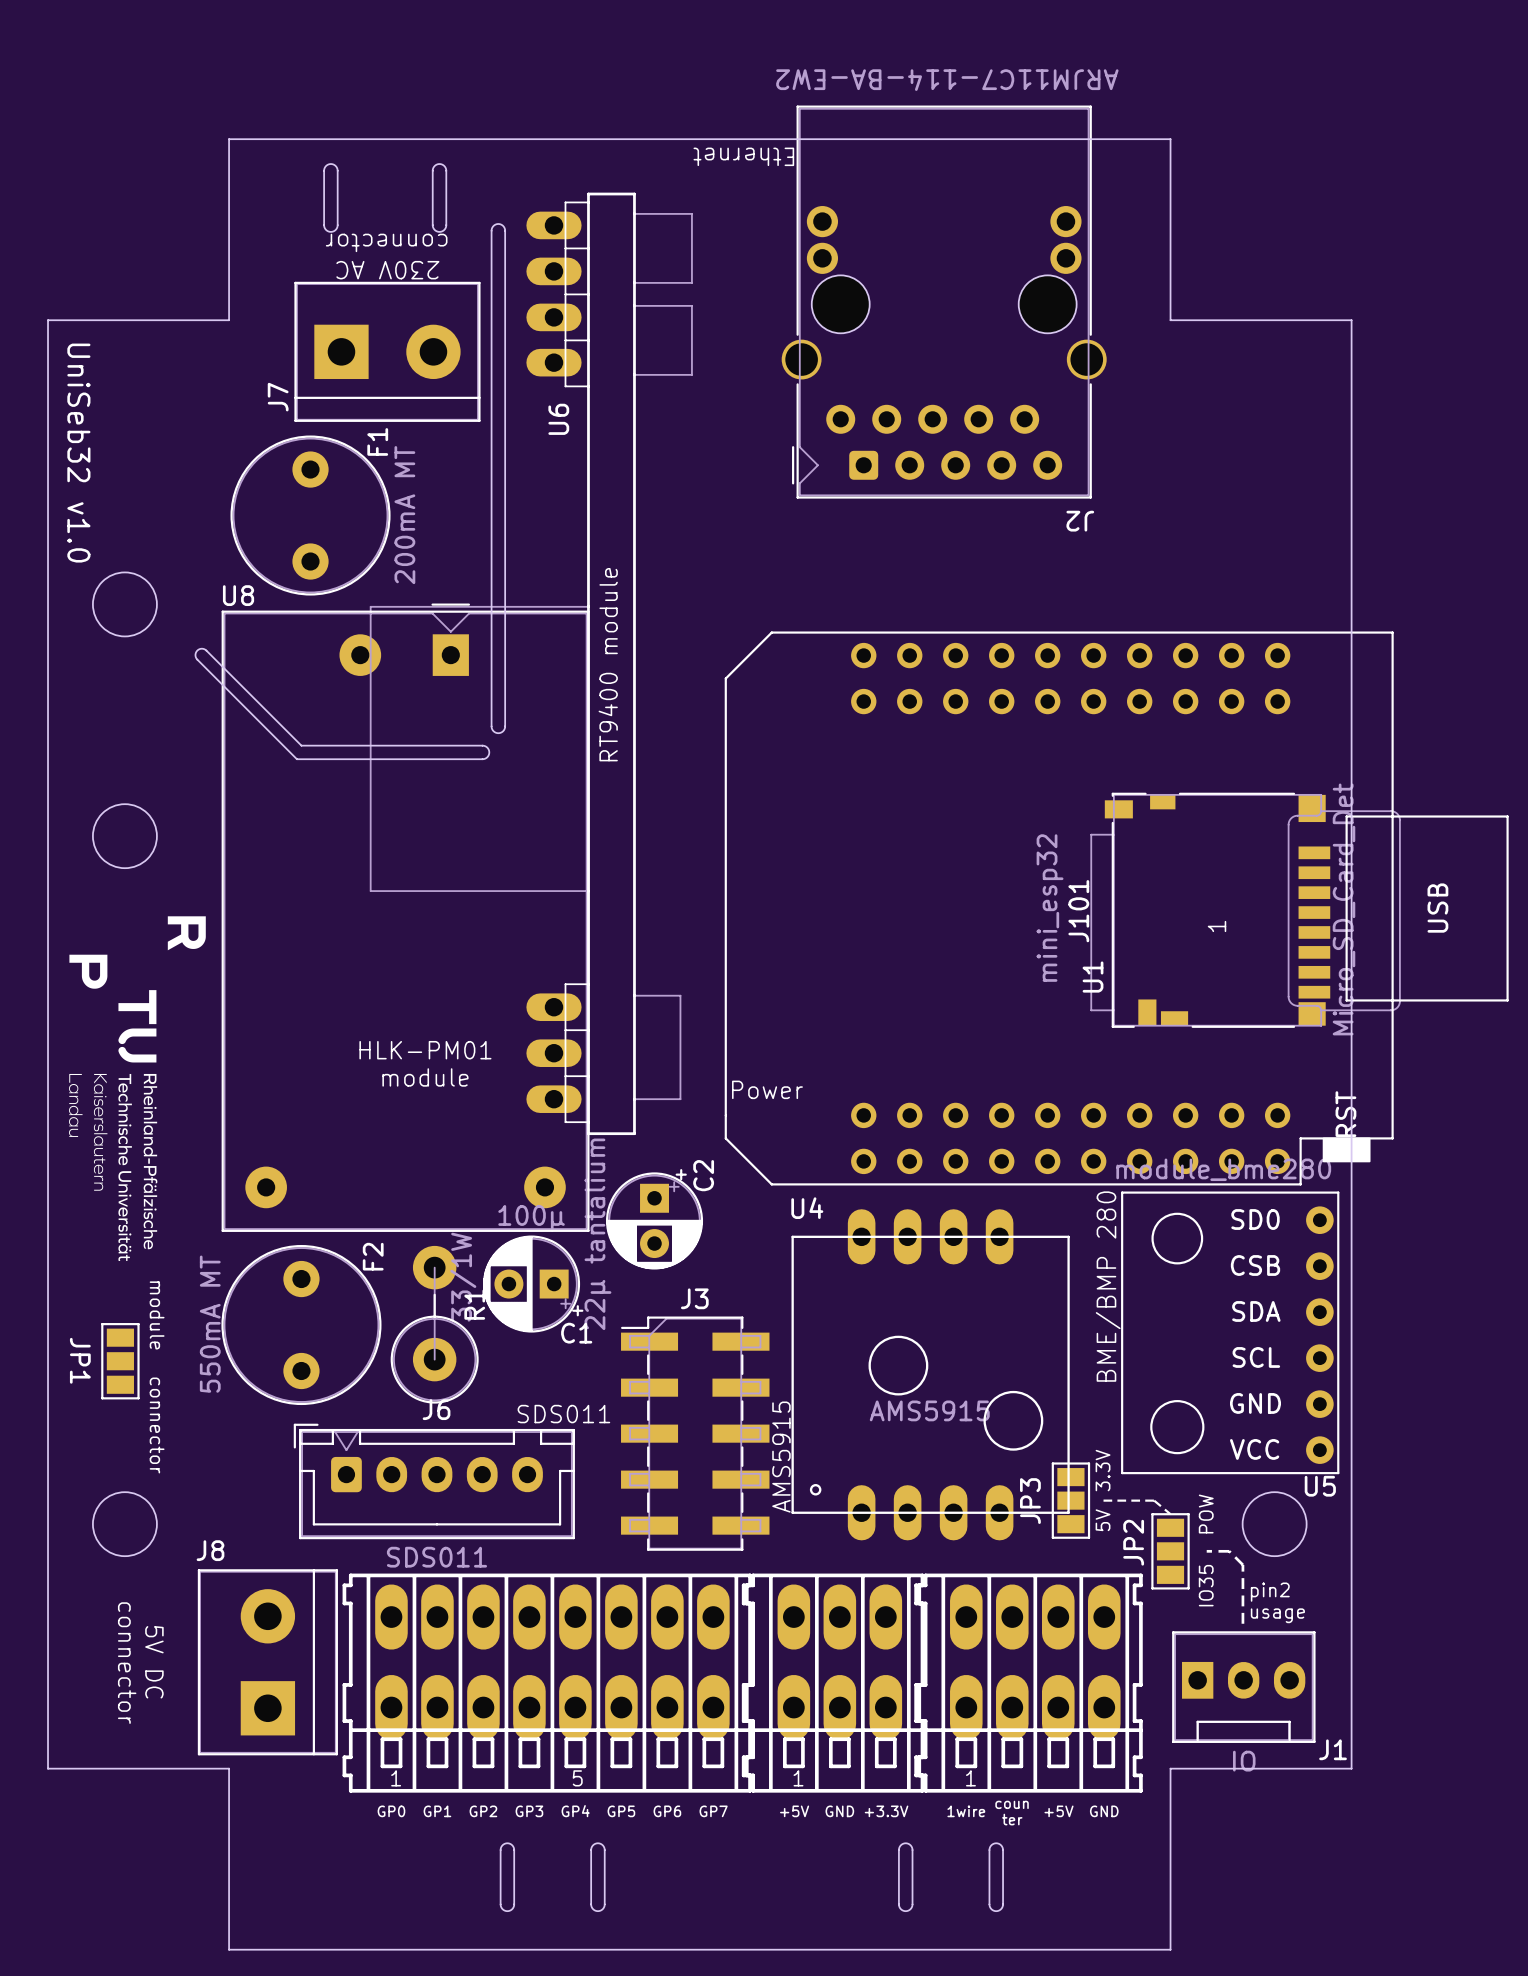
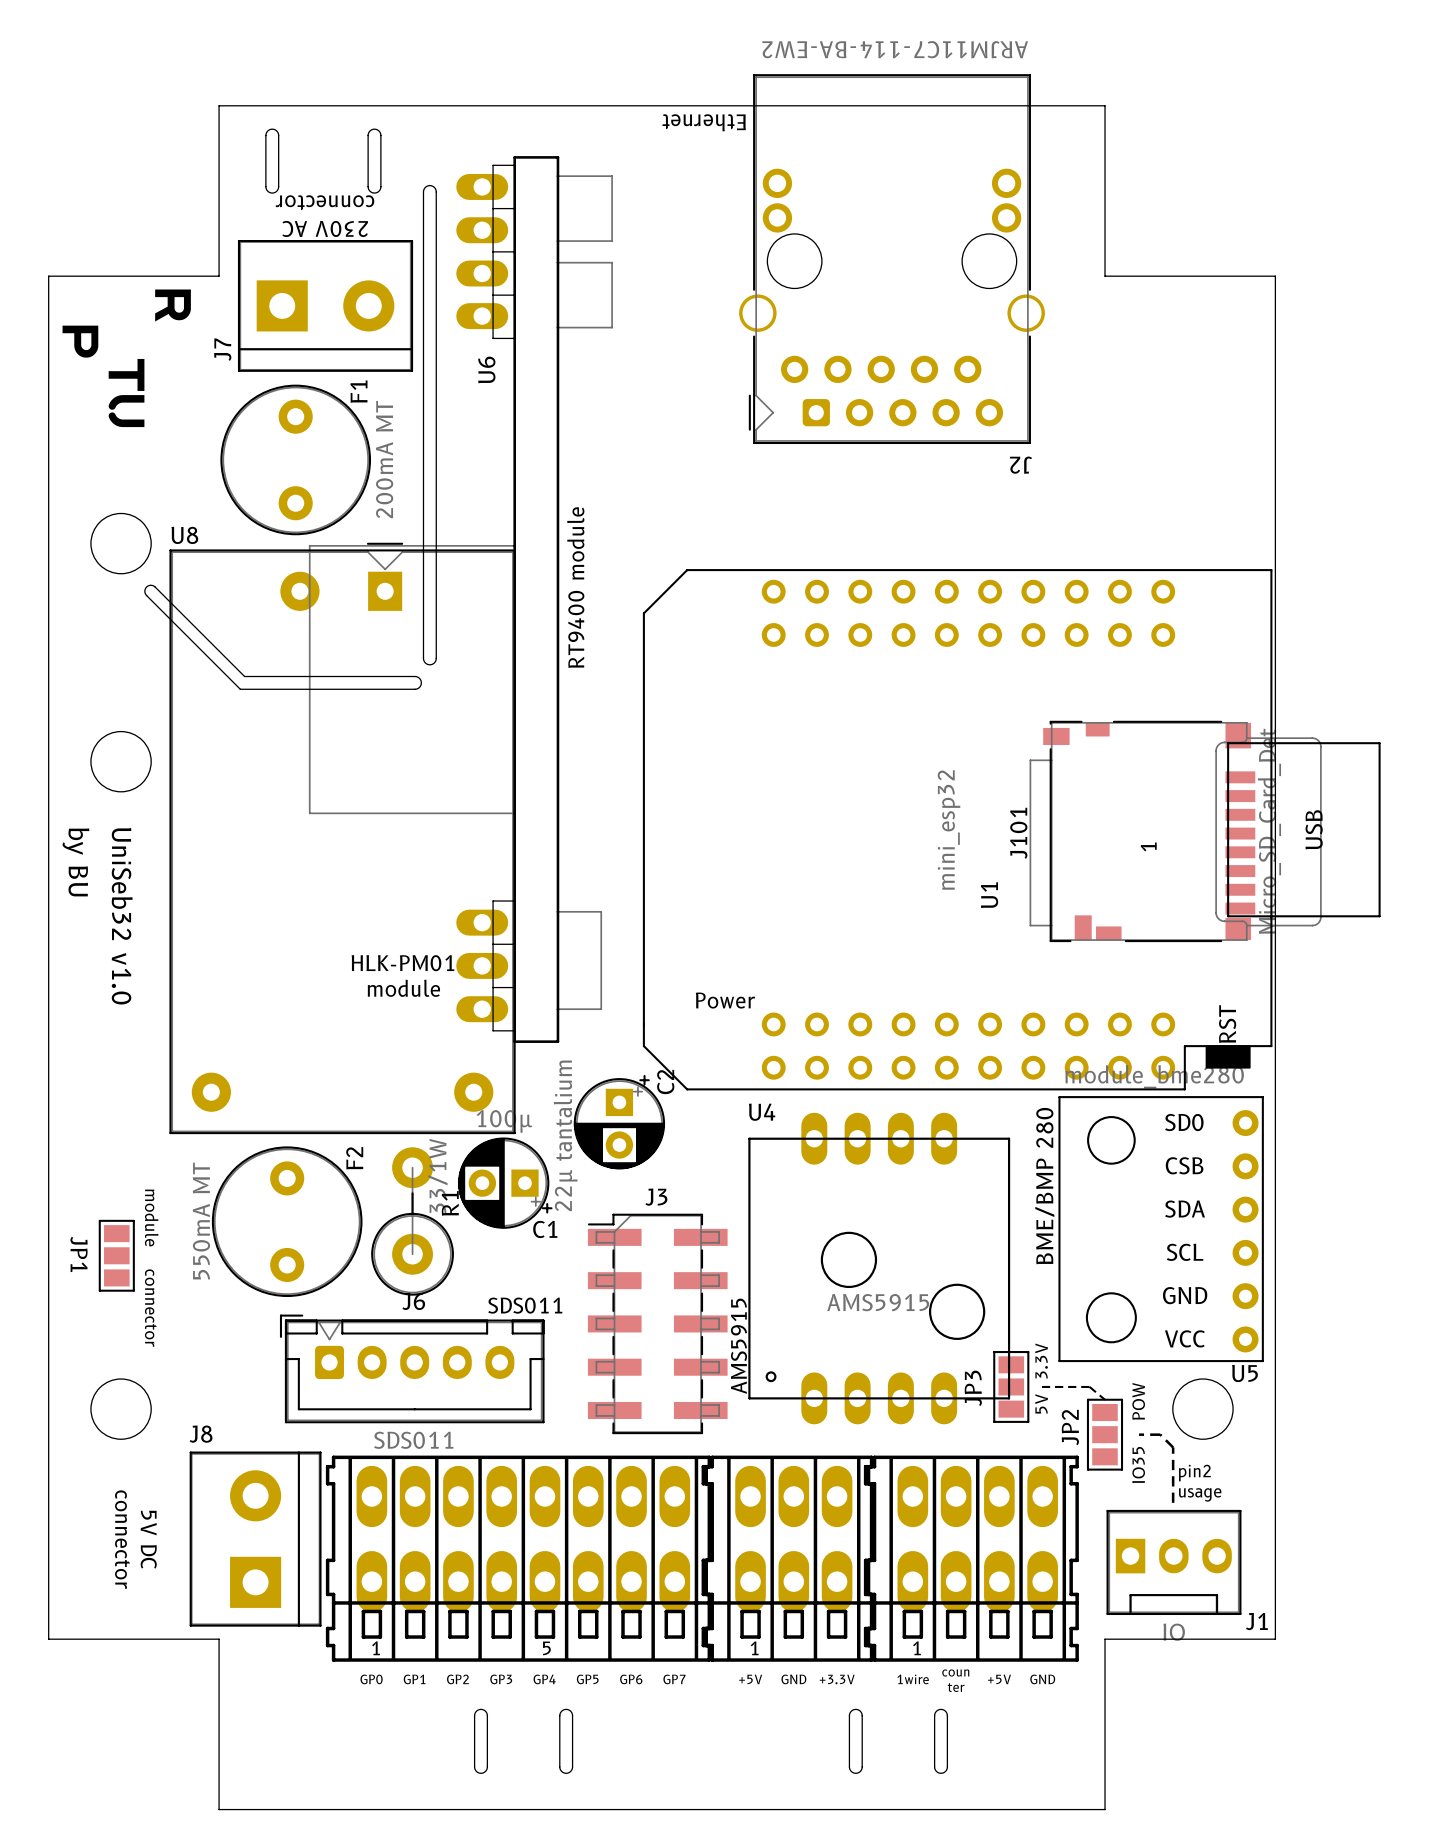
board edge: (324, 170) (324, 226) (326, 230) (331, 231) (337, 226) (337, 169) (335, 165) (329, 164) (326, 166) (324, 170) -> (265, 135) (265, 187) (268, 191) (273, 193) (278, 187) (278, 134) (276, 130) (271, 129) (267, 131) (265, 135)
board edge: (432, 170) (432, 226) (435, 230) (440, 231) (446, 226) (446, 169) (443, 165) (438, 164) (434, 166) (432, 170) -> (368, 135) (368, 187) (370, 191) (375, 193) (380, 187) (380, 134) (378, 130) (373, 129) (369, 131) (368, 135)
board edge: (491, 230) (491, 726) (493, 731) (498, 733) (503, 731) (505, 726) (505, 230) (503, 225) (498, 223) (493, 225) (491, 230) -> (423, 191) (423, 658) (425, 662) (429, 664) (434, 662) (436, 658) (436, 191) (434, 187) (429, 185) (425, 187) (423, 191)
text position: connector (386, 242) -> connector (324, 202)
text position: 230V AC (387, 270) -> 230V AC (325, 228)
drawing: none -> [155, 289, 191, 322]
J7 position: (387, 351) -> (325, 305)
drawing: none -> [62, 325, 145, 428]
text: UniSeb32 v1.0 (78, 453) -> none
U6 position: (531, 663) -> (460, 599)
board edge: (301, 745) (206, 650) (201, 648) (197, 650) (195, 655) (197, 659) (296, 759) -> (287, 676) (244, 676) (155, 587) (150, 585) (145, 588) (146, 595) (240, 689) (282, 689)
board edge: (437, 745) (483, 745) (487, 748) (489, 752) (487, 756) (483, 759) (437, 759) -> (414, 676) (419, 678) (421, 682) (419, 687) (414, 689)
U1 position: (1116, 908) -> (1011, 829)
drawing: [167, 916, 206, 951] -> none
U8 position: (405, 917) -> (342, 838)
text: none -> by BU (75, 862)
drawing: [69, 954, 158, 1261] -> none
text: none -> UniSeb32 v1.0 (122, 916)

